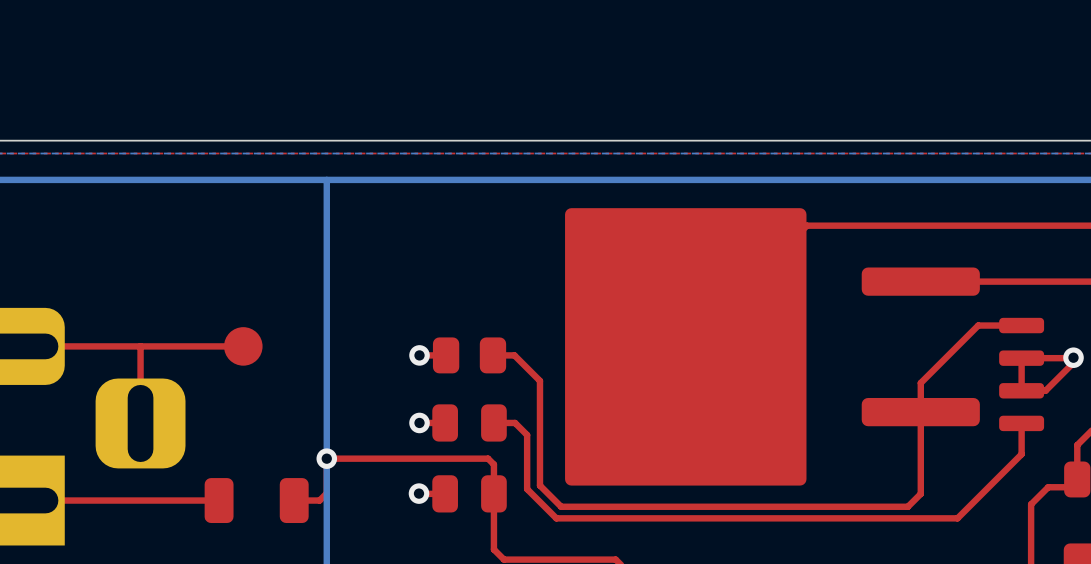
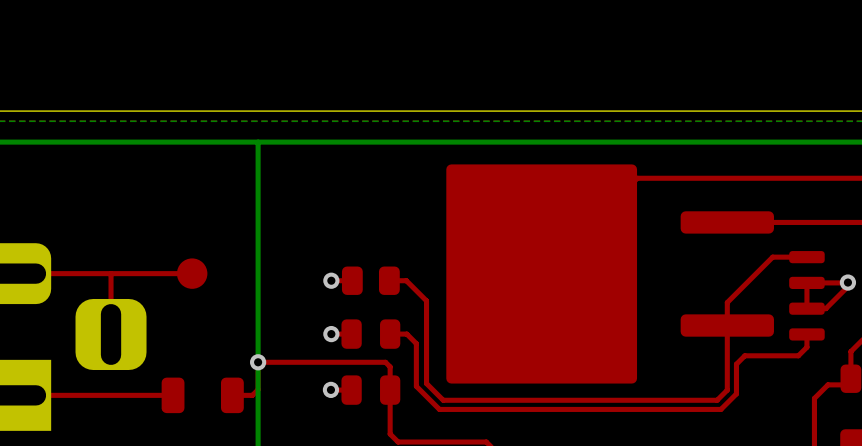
top track: (1021, 439) (1021, 454) (957, 518) (912, 518) -> (806, 347) (798, 355) (744, 355) (736, 364) (736, 393) (720, 409)

